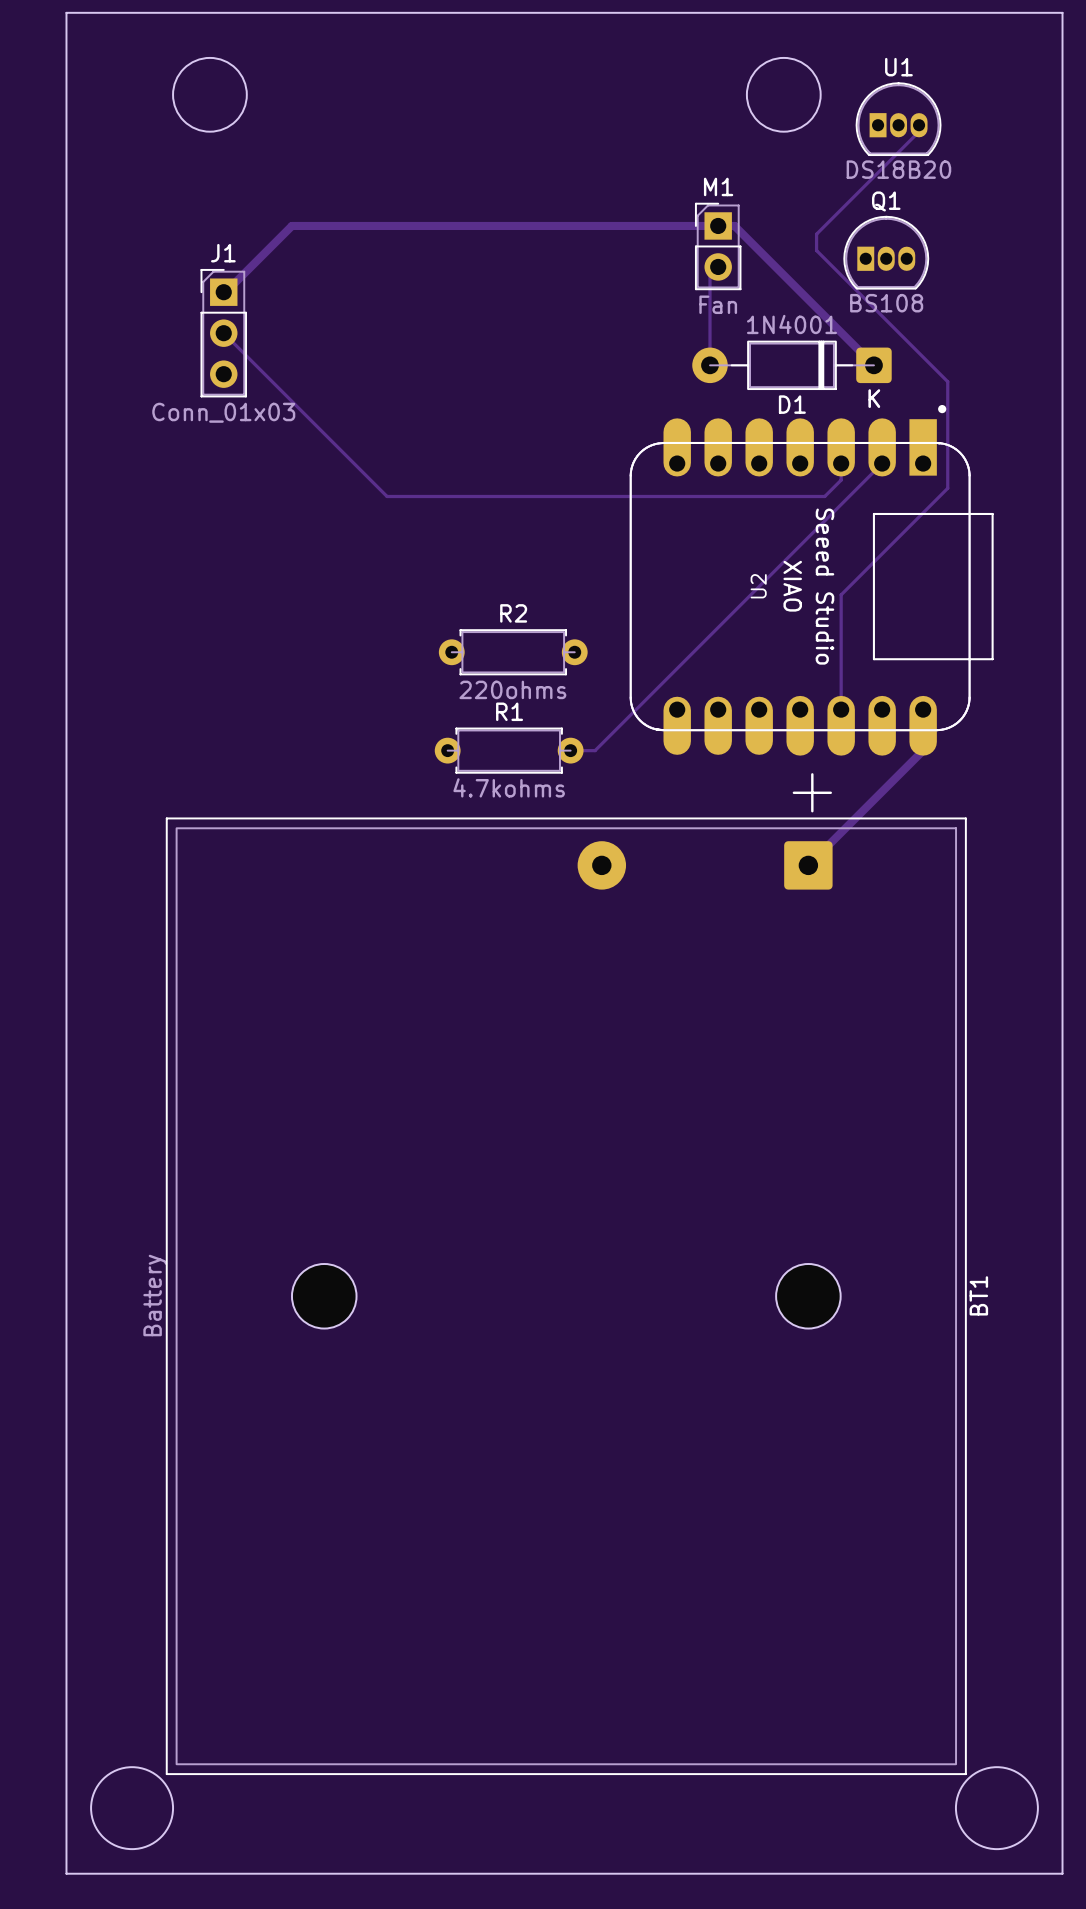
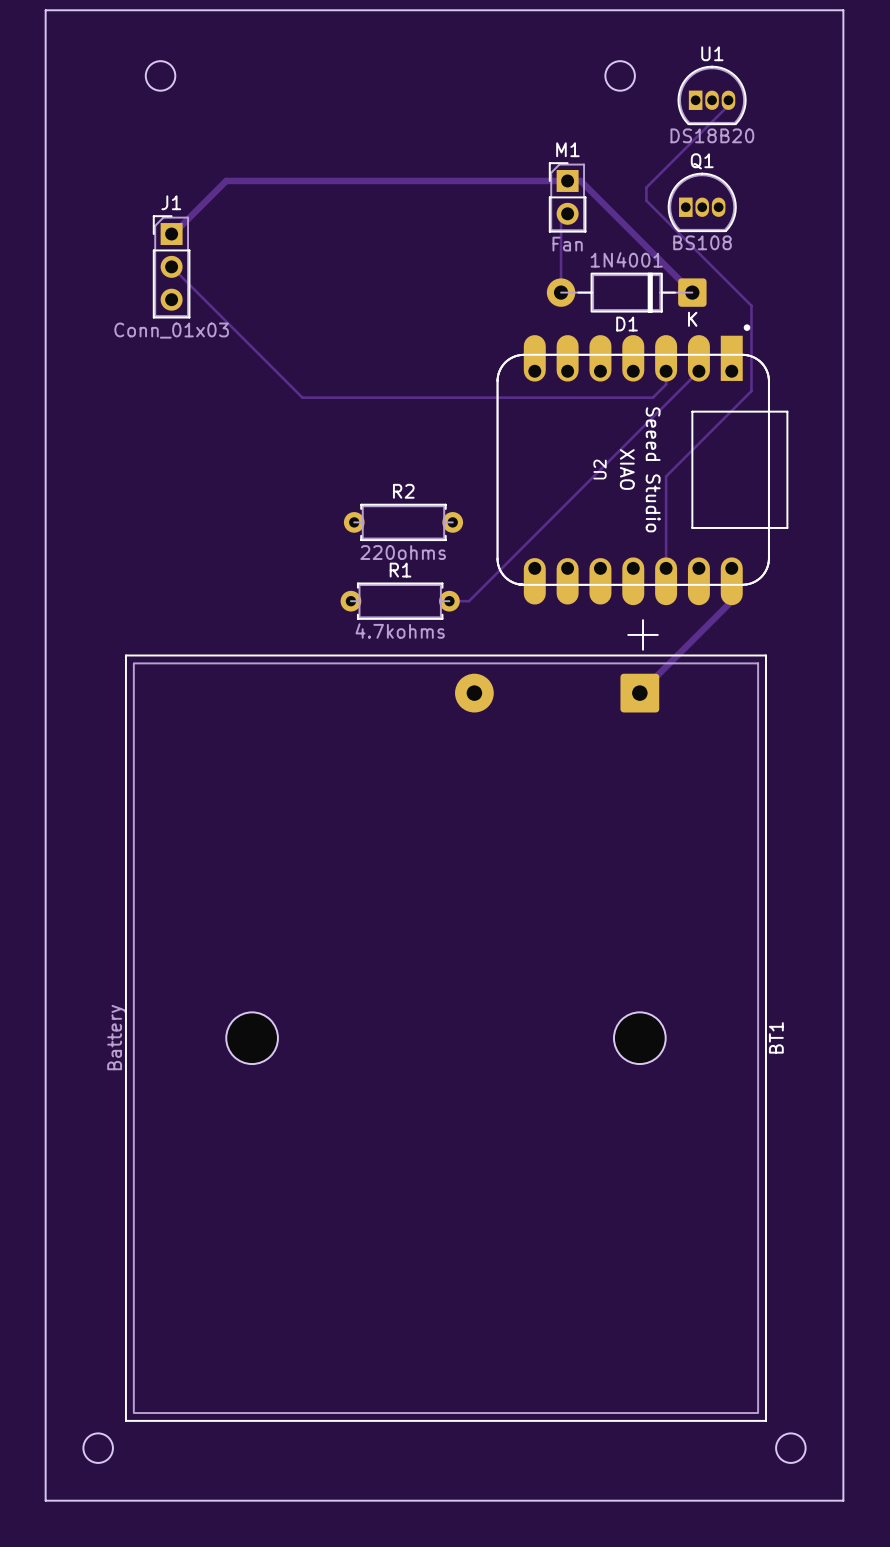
round board edge size: [172, 57, 248, 133] -> [145, 60, 176, 92]
round board edge size: [746, 57, 822, 133] -> [605, 60, 636, 92]
round board edge size: [90, 1766, 174, 1850] -> [83, 1433, 114, 1464]
round board edge size: [955, 1766, 1039, 1850] -> [775, 1433, 806, 1464]

